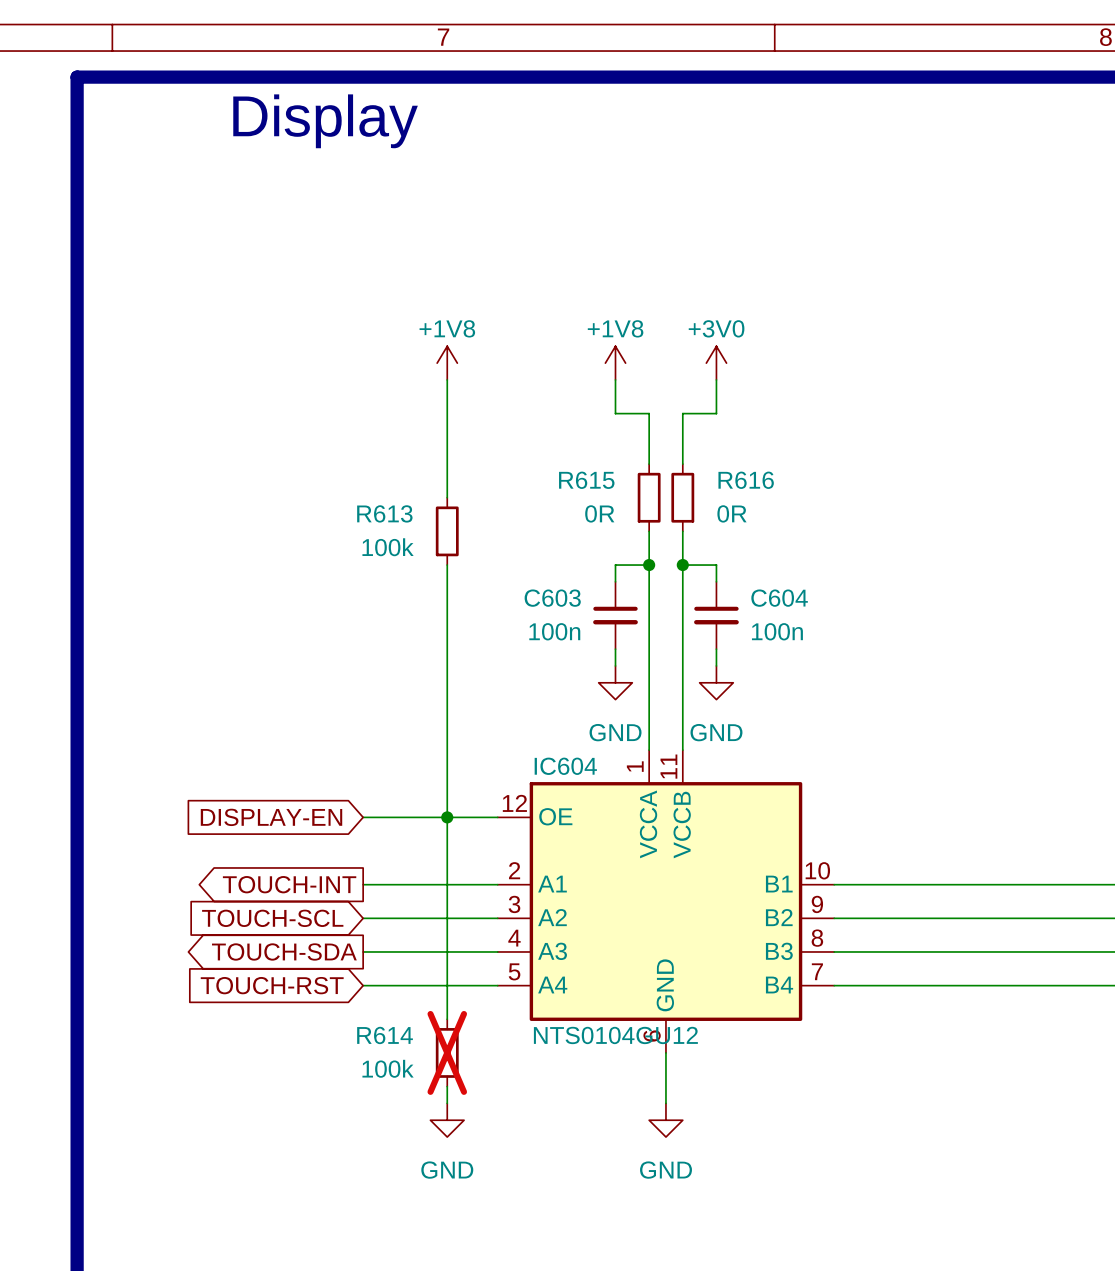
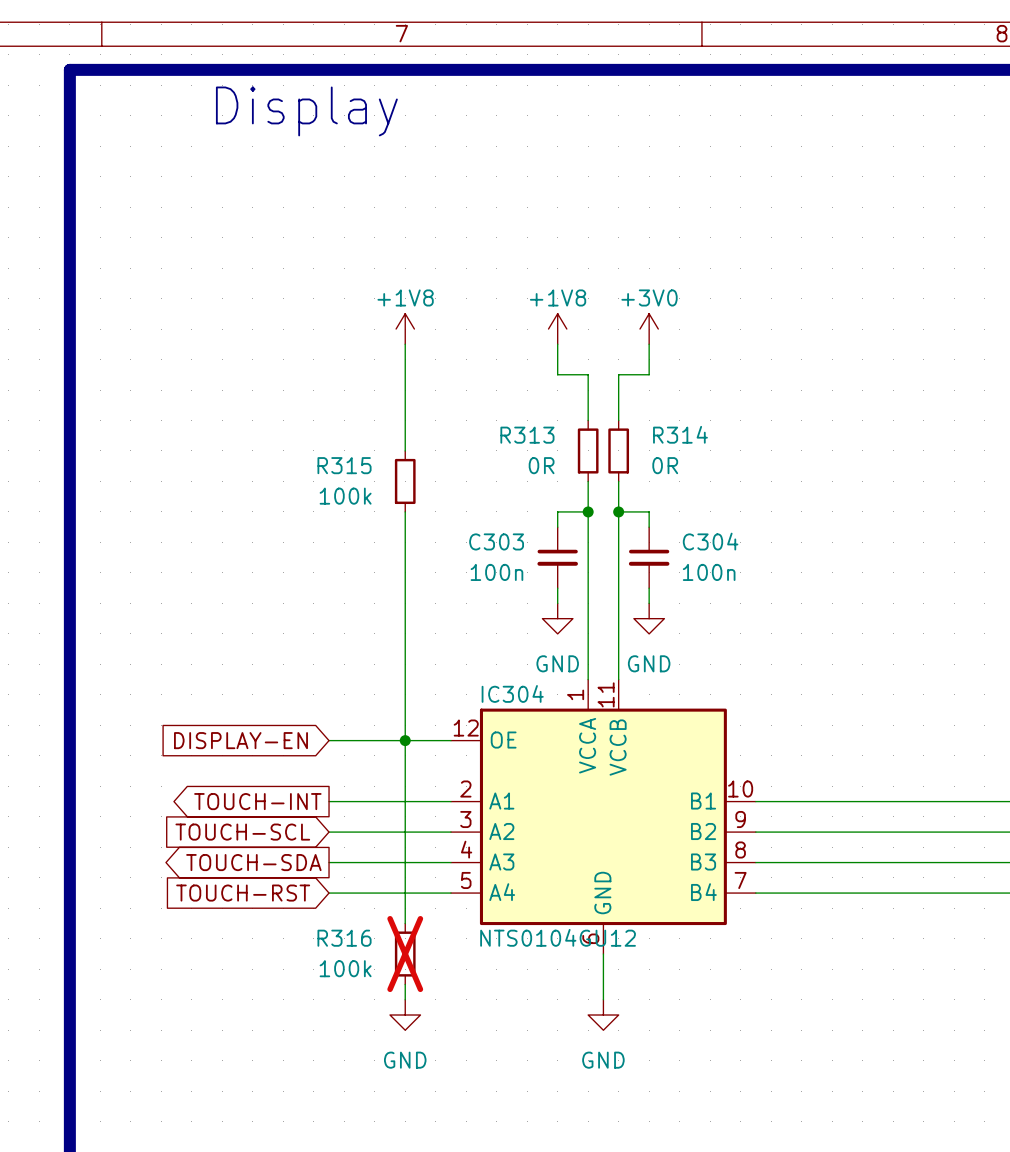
R615 name: R615 (586, 480) -> R313 (527, 435)
R616 name: R616 (746, 480) -> R314 (680, 434)
R613 name: R613 (384, 513) -> R315 (344, 465)
C603 name: C603 (552, 598) -> C303 (496, 541)
C604 name: C604 (779, 598) -> C304 (710, 541)
IC604 name: IC604 (565, 766) -> IC304 (512, 693)
R614 name: R614 (385, 1035) -> R316 (344, 938)

